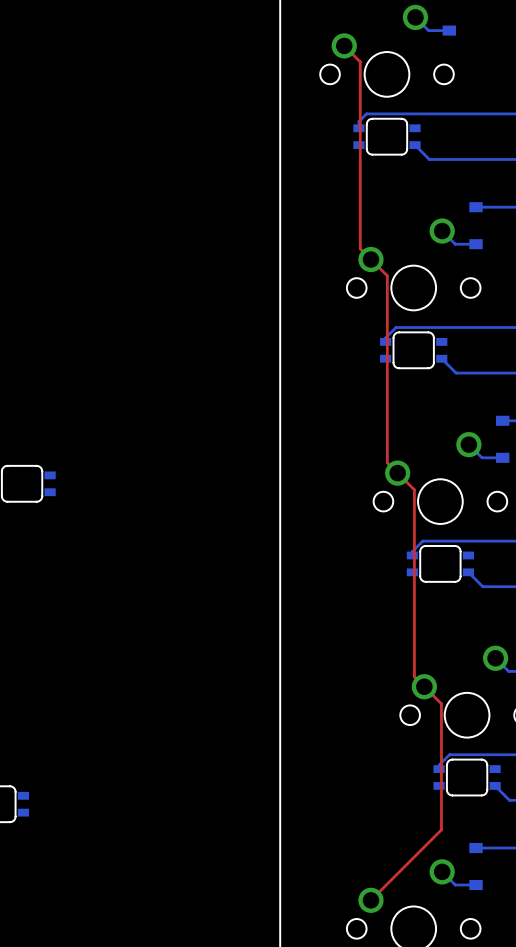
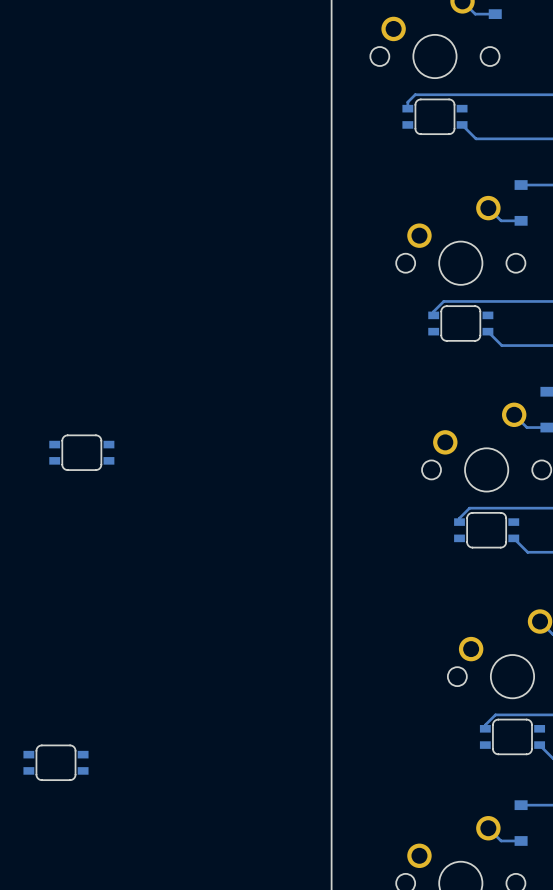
top track: (344, 45) (360, 61) (360, 248) (387, 275) (387, 462) (414, 489) (414, 676) (441, 703) (441, 829) (370, 900) -> none

